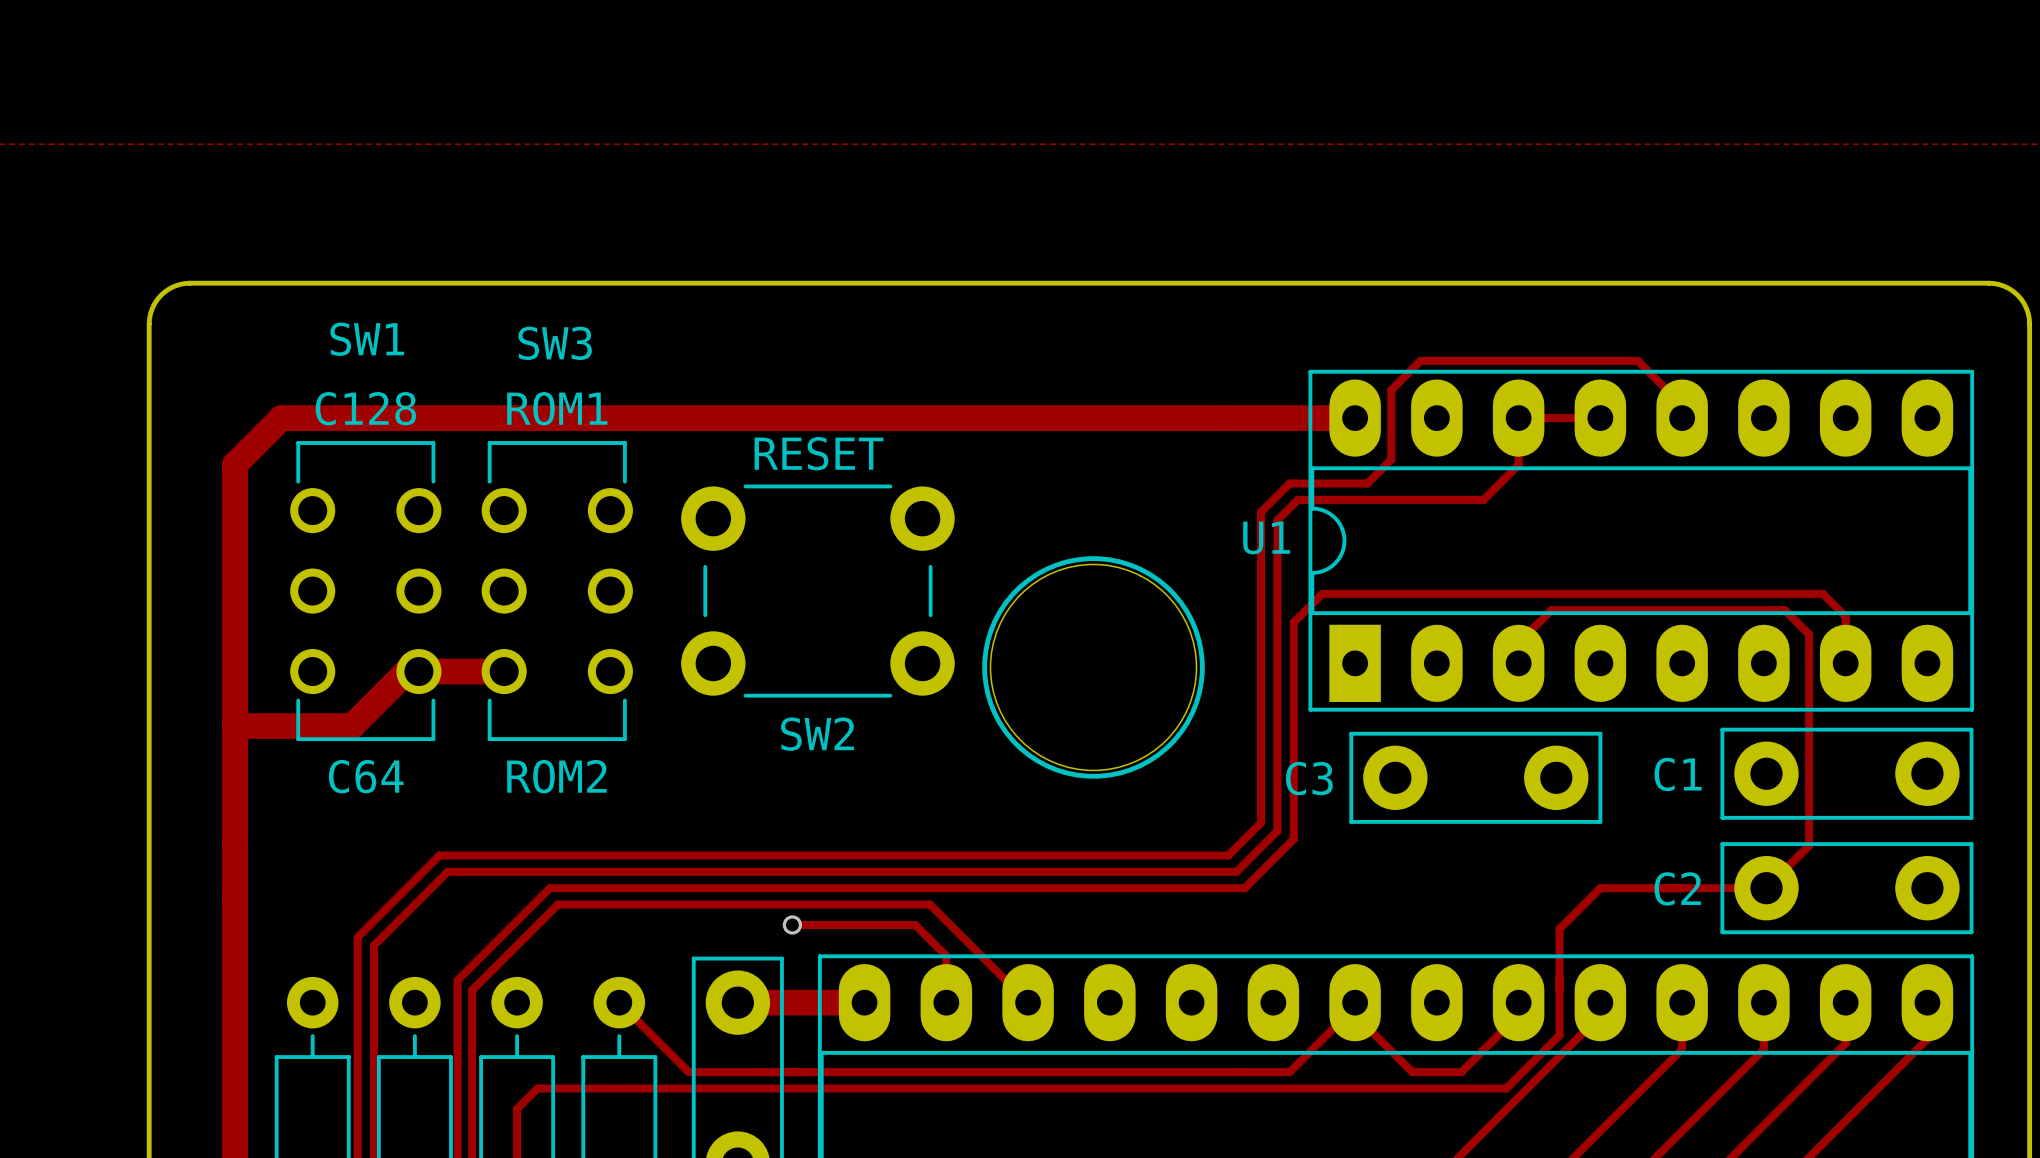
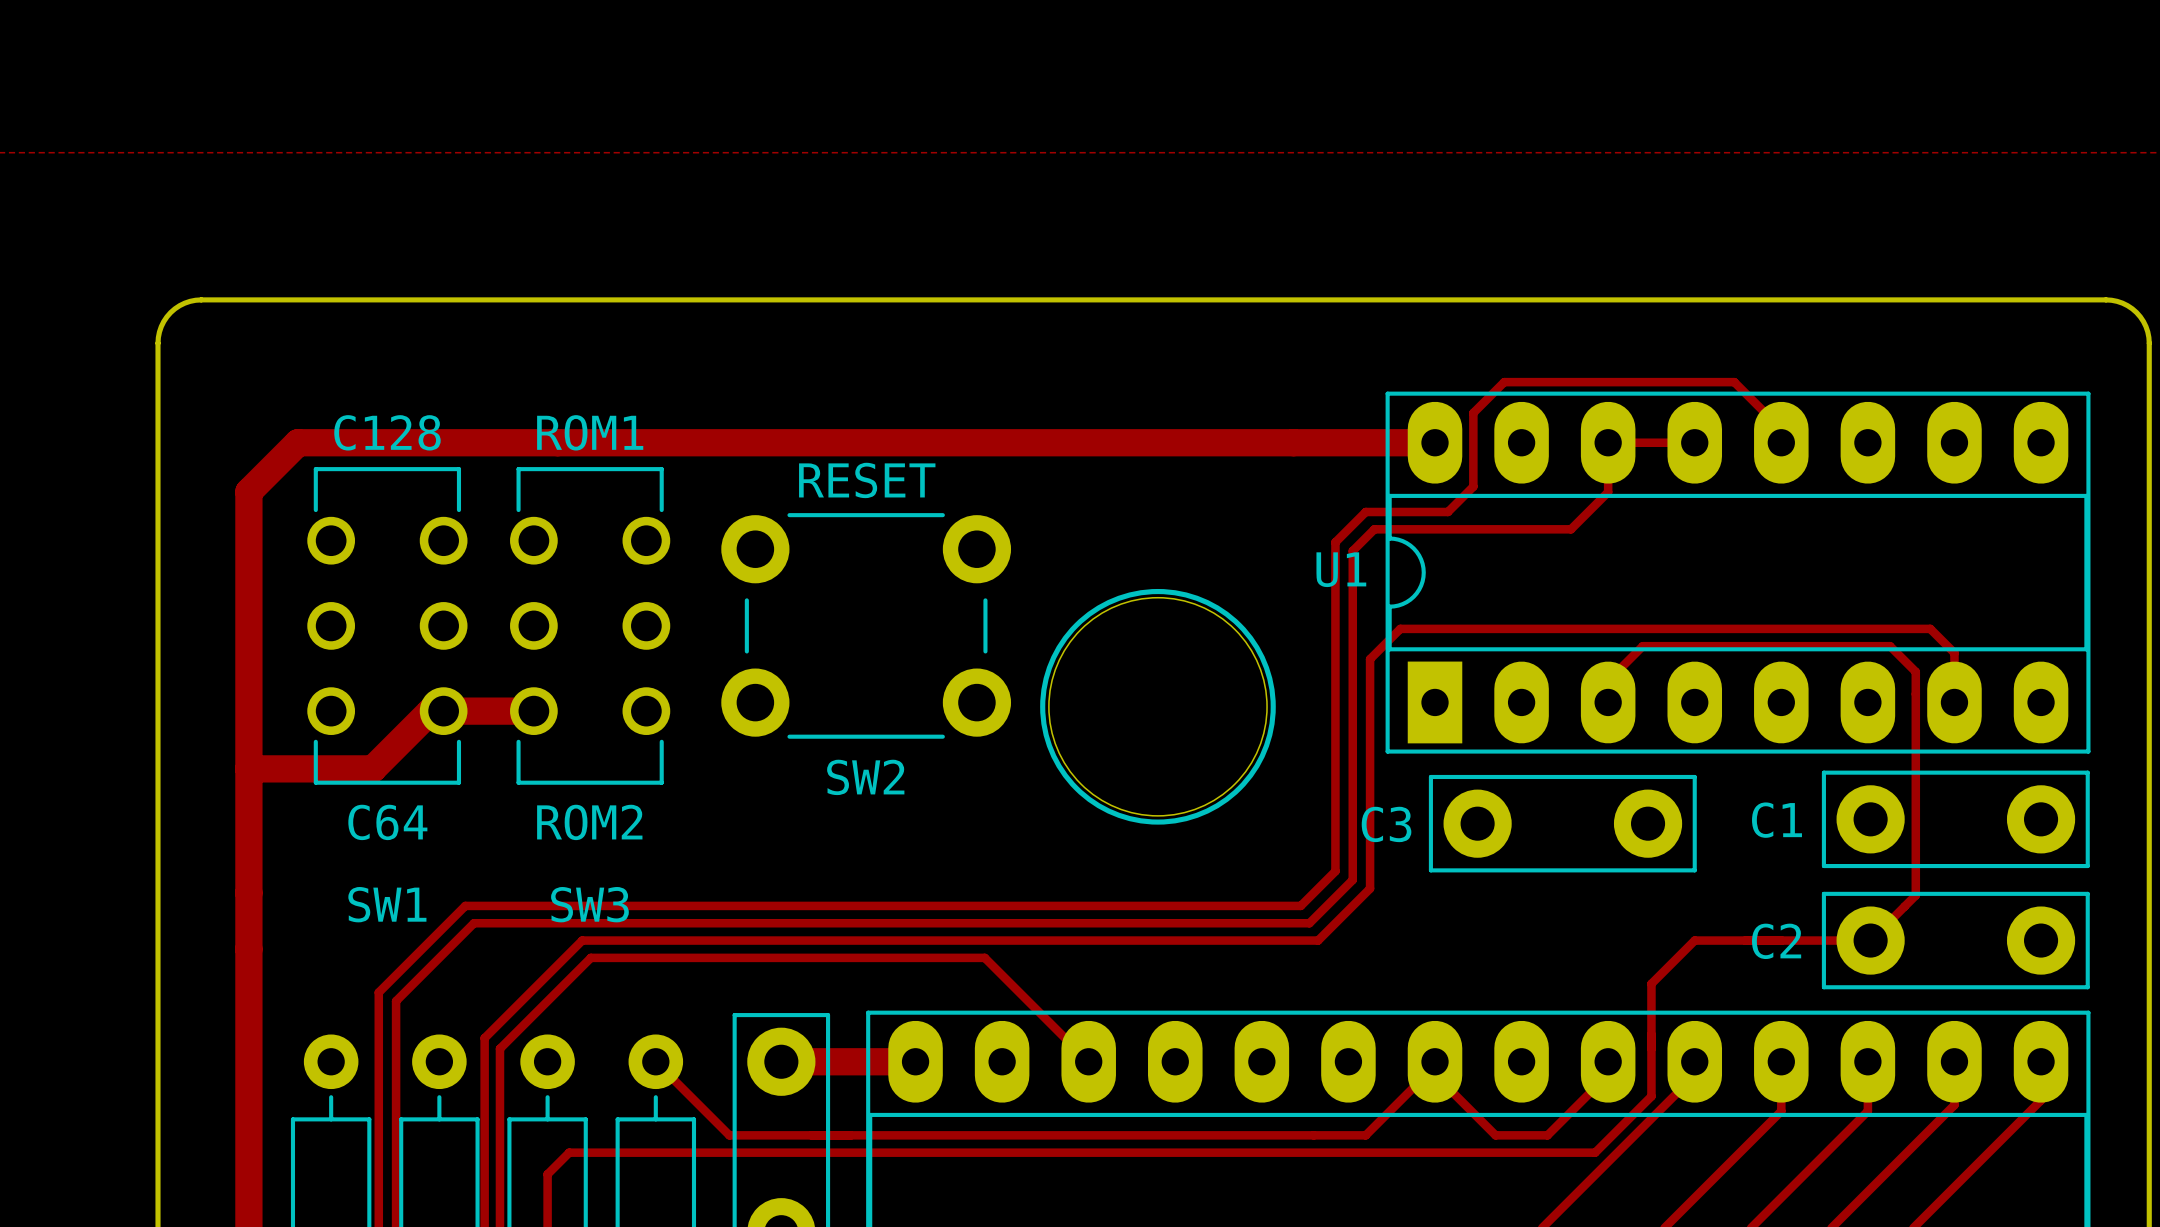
SW1 name position: SW1 (367, 339) -> SW1 (387, 904)
SW3 name position: SW3 (555, 343) -> SW3 (589, 904)
track: (792, 924) (915, 924) (946, 955) (946, 1002) -> none
via: (792, 924) -> none

